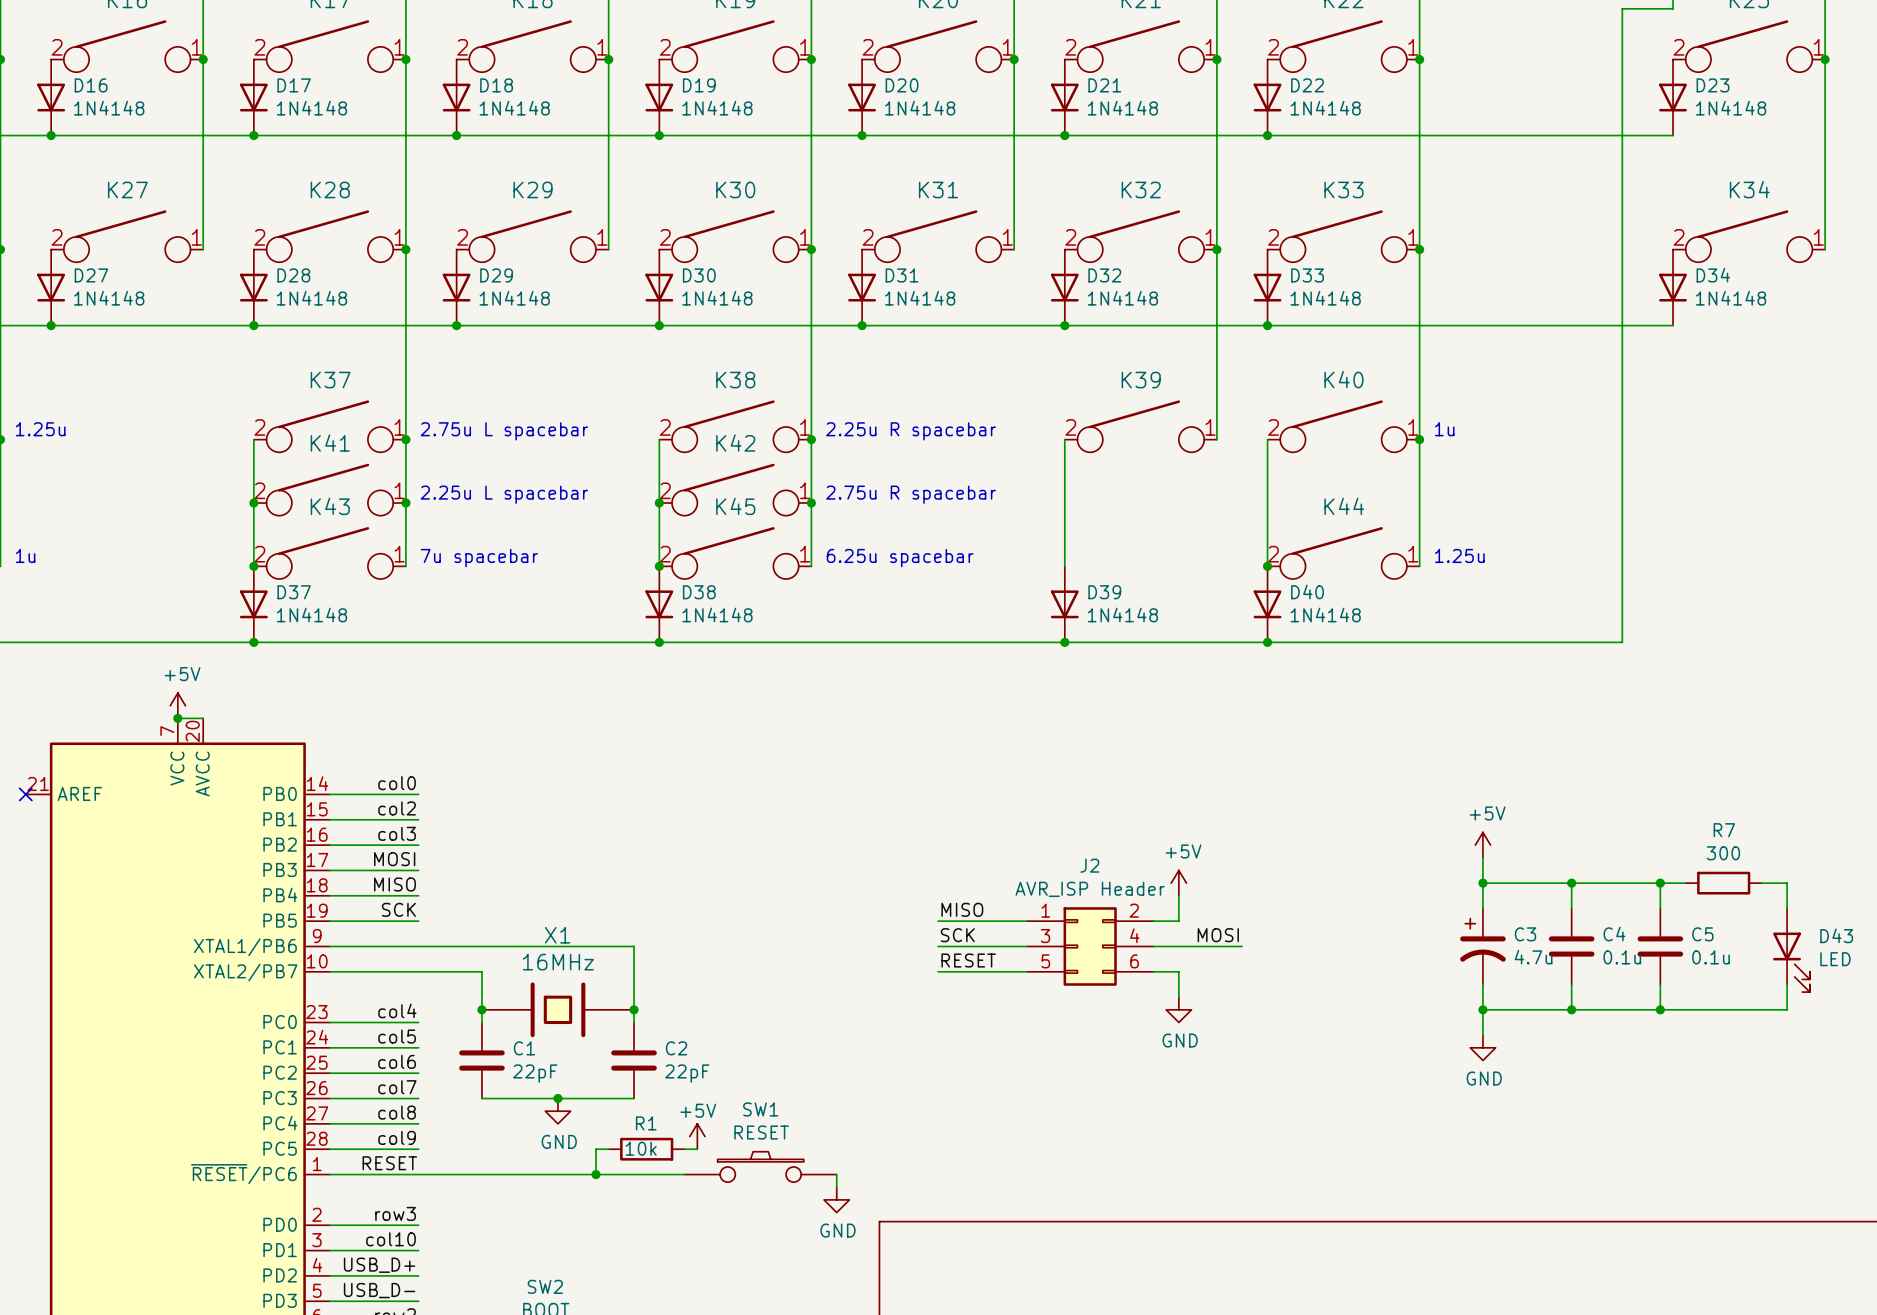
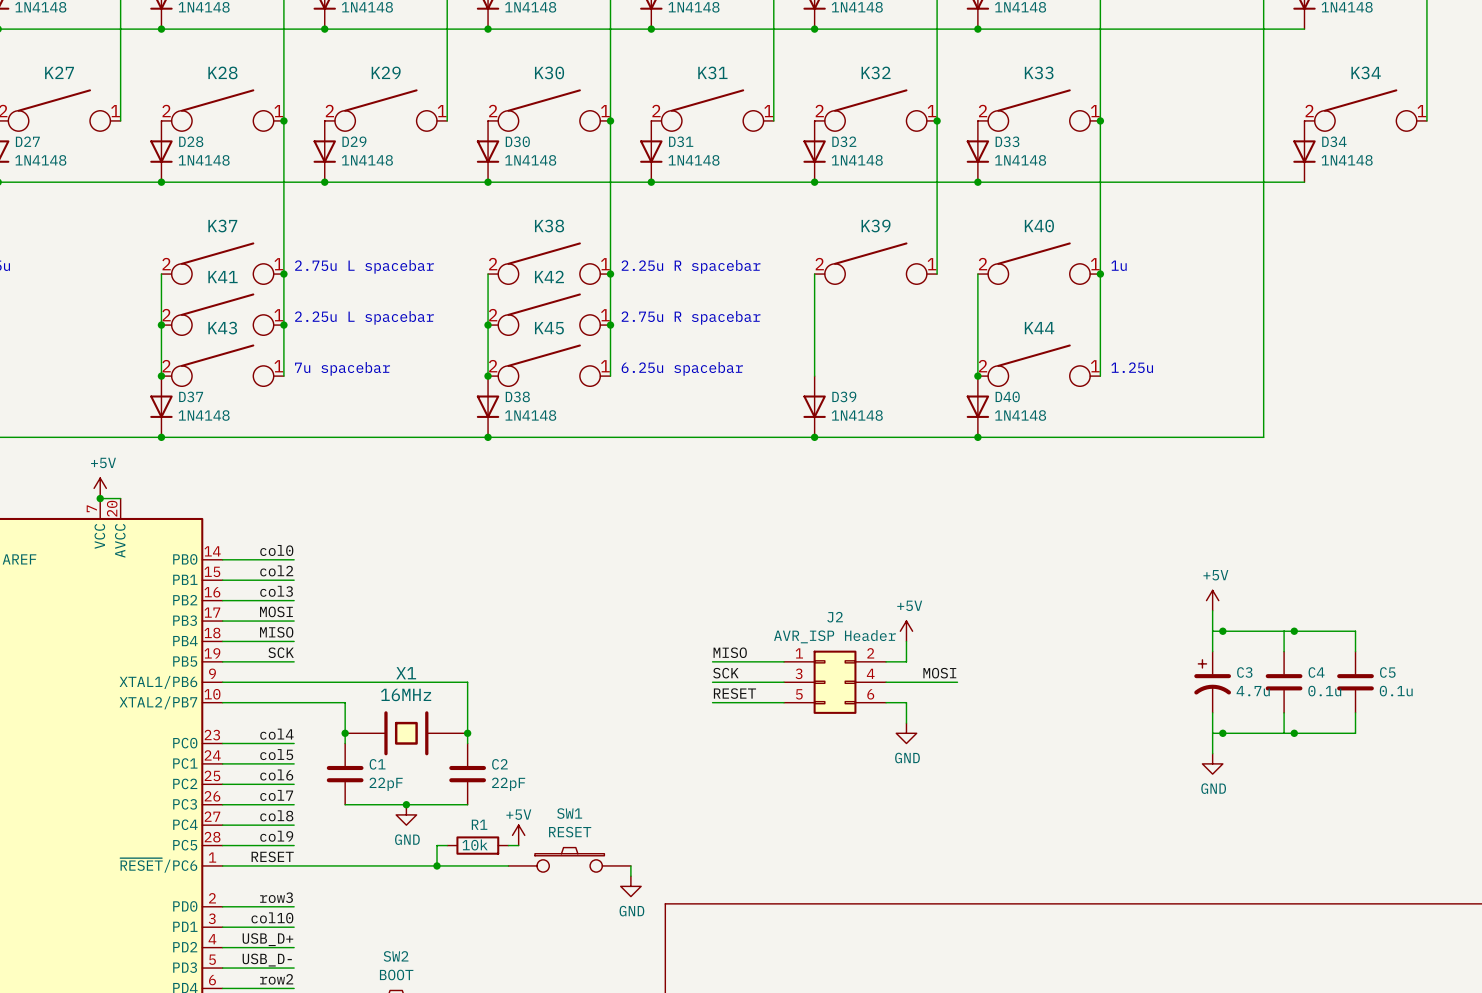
power symbol position: +5V (1482, 845) -> +5V (1212, 600)
wire: (1482, 857) (1482, 908) -> (1212, 610) (1212, 651)
wire: (1482, 883) (1558, 883) -> none
junction: (1482, 883) -> none
wire: (1571, 883) (1571, 908) -> (1284, 631) (1284, 651)
wire: (1660, 883) (1660, 908) -> none
wire: none -> (1314, 631) (1355, 631) (1355, 651)
R7: 300 (1723, 883) -> none
wire: (1761, 883) (1787, 883) (1787, 908) -> none
C3 position: (1482, 946) -> (1212, 682)
C4 position: (1571, 946) -> (1284, 682)
C5 position: (1660, 946) -> (1355, 682)
D43: LED (1791, 950) -> none
wire: (1482, 984) (1482, 1035) -> (1212, 712) (1212, 753)
wire: (1571, 984) (1571, 1009) -> (1284, 712) (1284, 733)
wire: (1660, 984) (1660, 1009) -> none
wire: (1787, 984) (1787, 1009) (1736, 1009) -> (1355, 712) (1355, 733)
wire: (1482, 1009) (1558, 1009) -> none
junction: (1482, 1009) -> none
power symbol position: GND (1482, 1047) -> GND (1212, 763)

